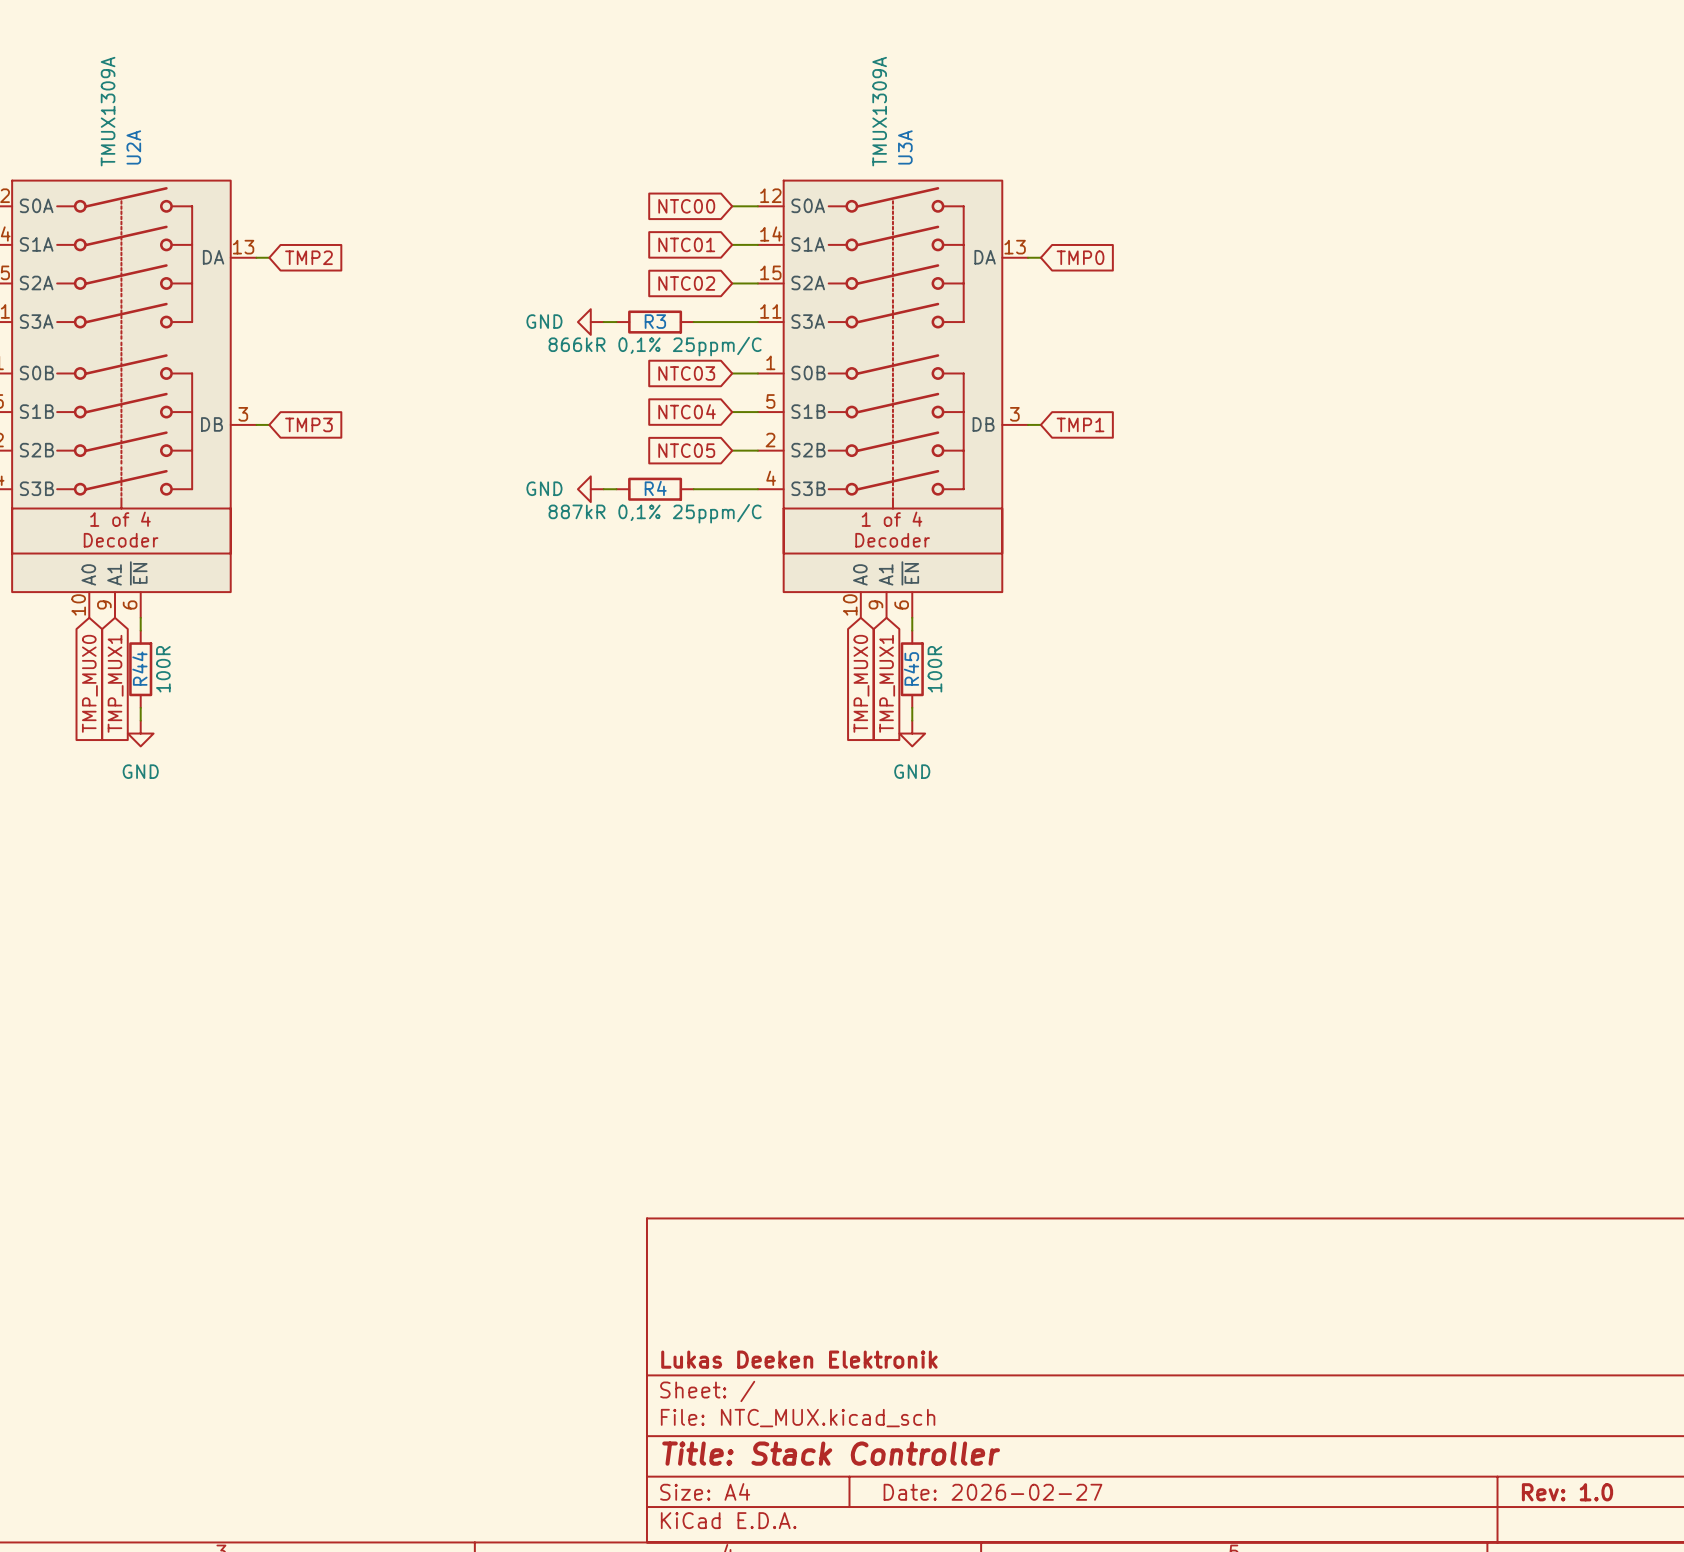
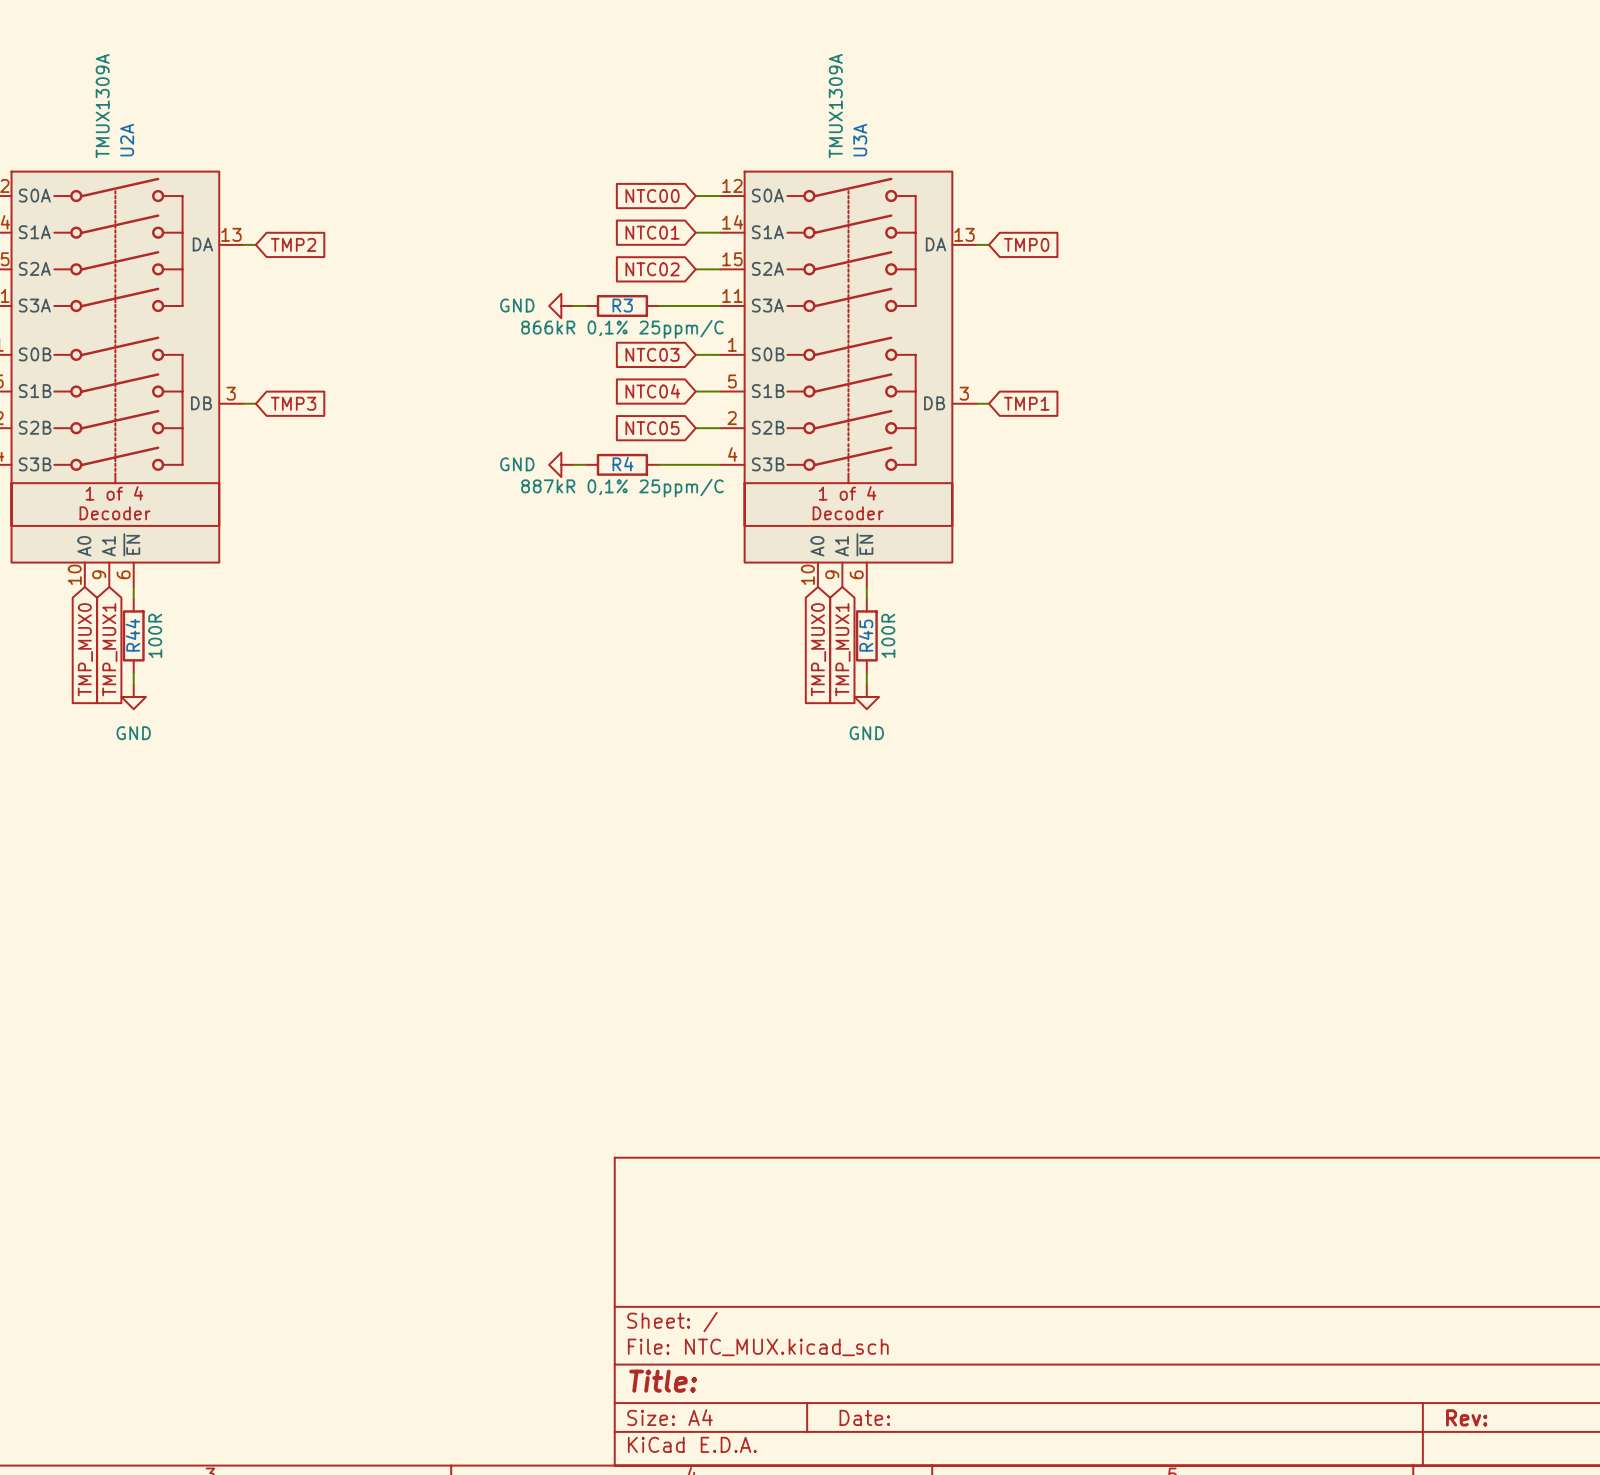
title block: Lukas Deeken Elektronik (799, 1359) -> none
title block: Title: Stack Controller (831, 1453) -> Title: (663, 1381)
title block: Date: 2026-02-27 (992, 1492) -> Date: (864, 1417)
title block: Rev: 1.0 (1567, 1492) -> Rev: (1466, 1417)

